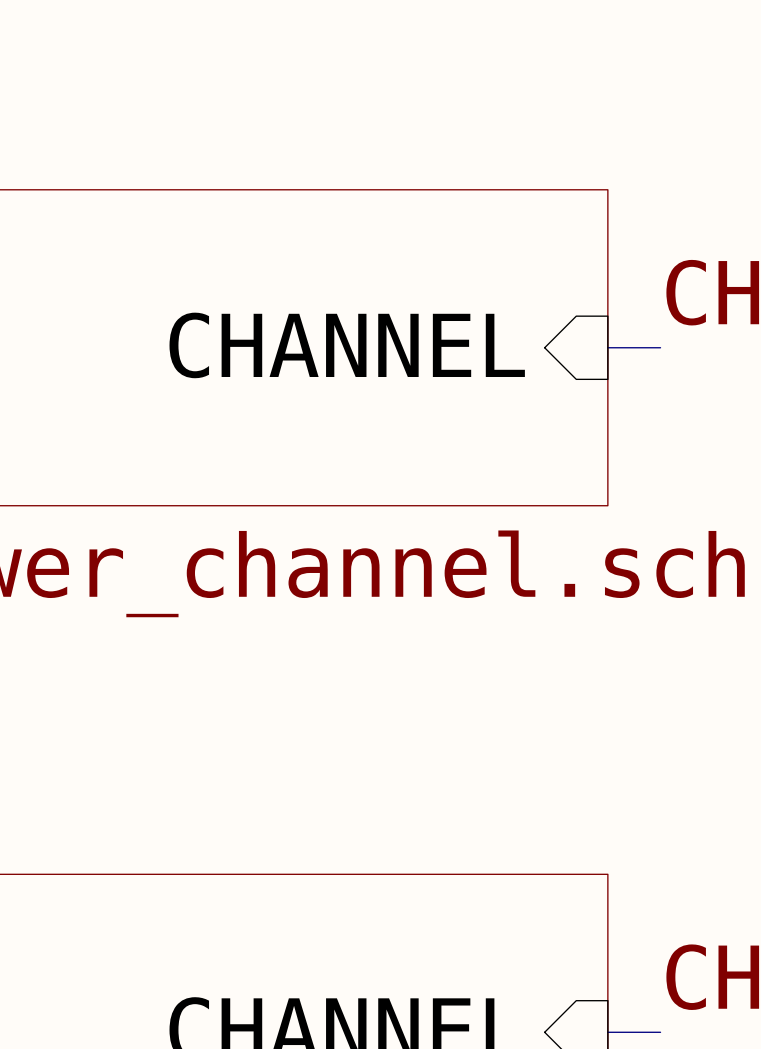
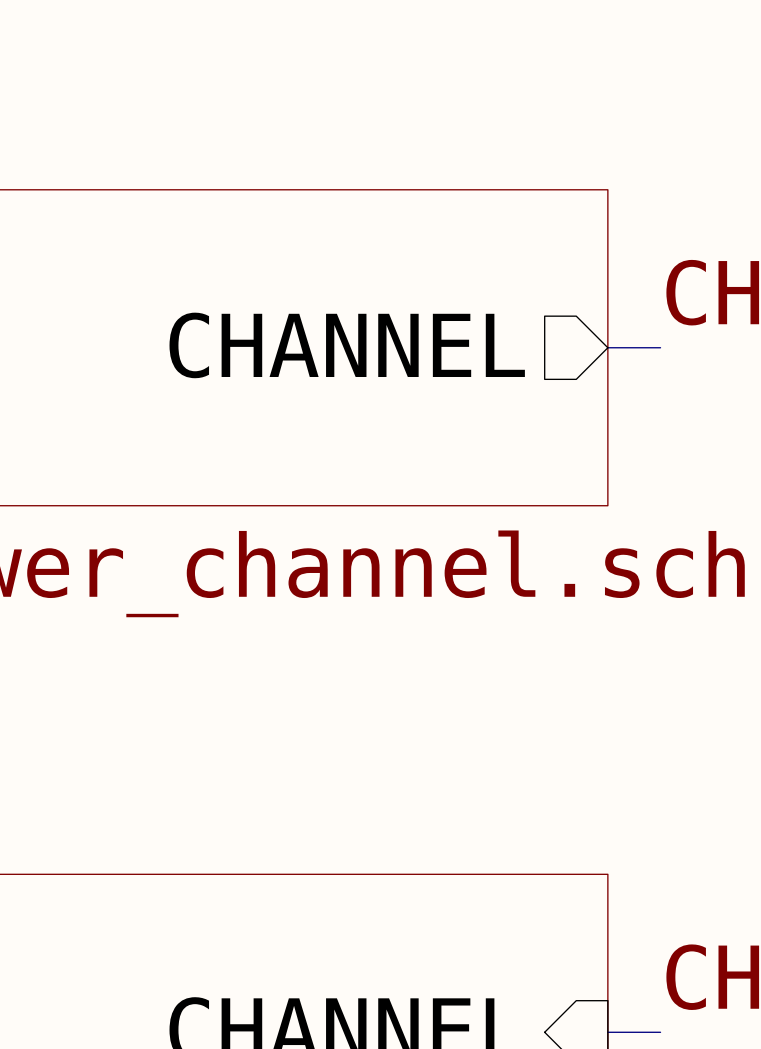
sheet pin shape: input (347, 345) -> output (347, 345)

